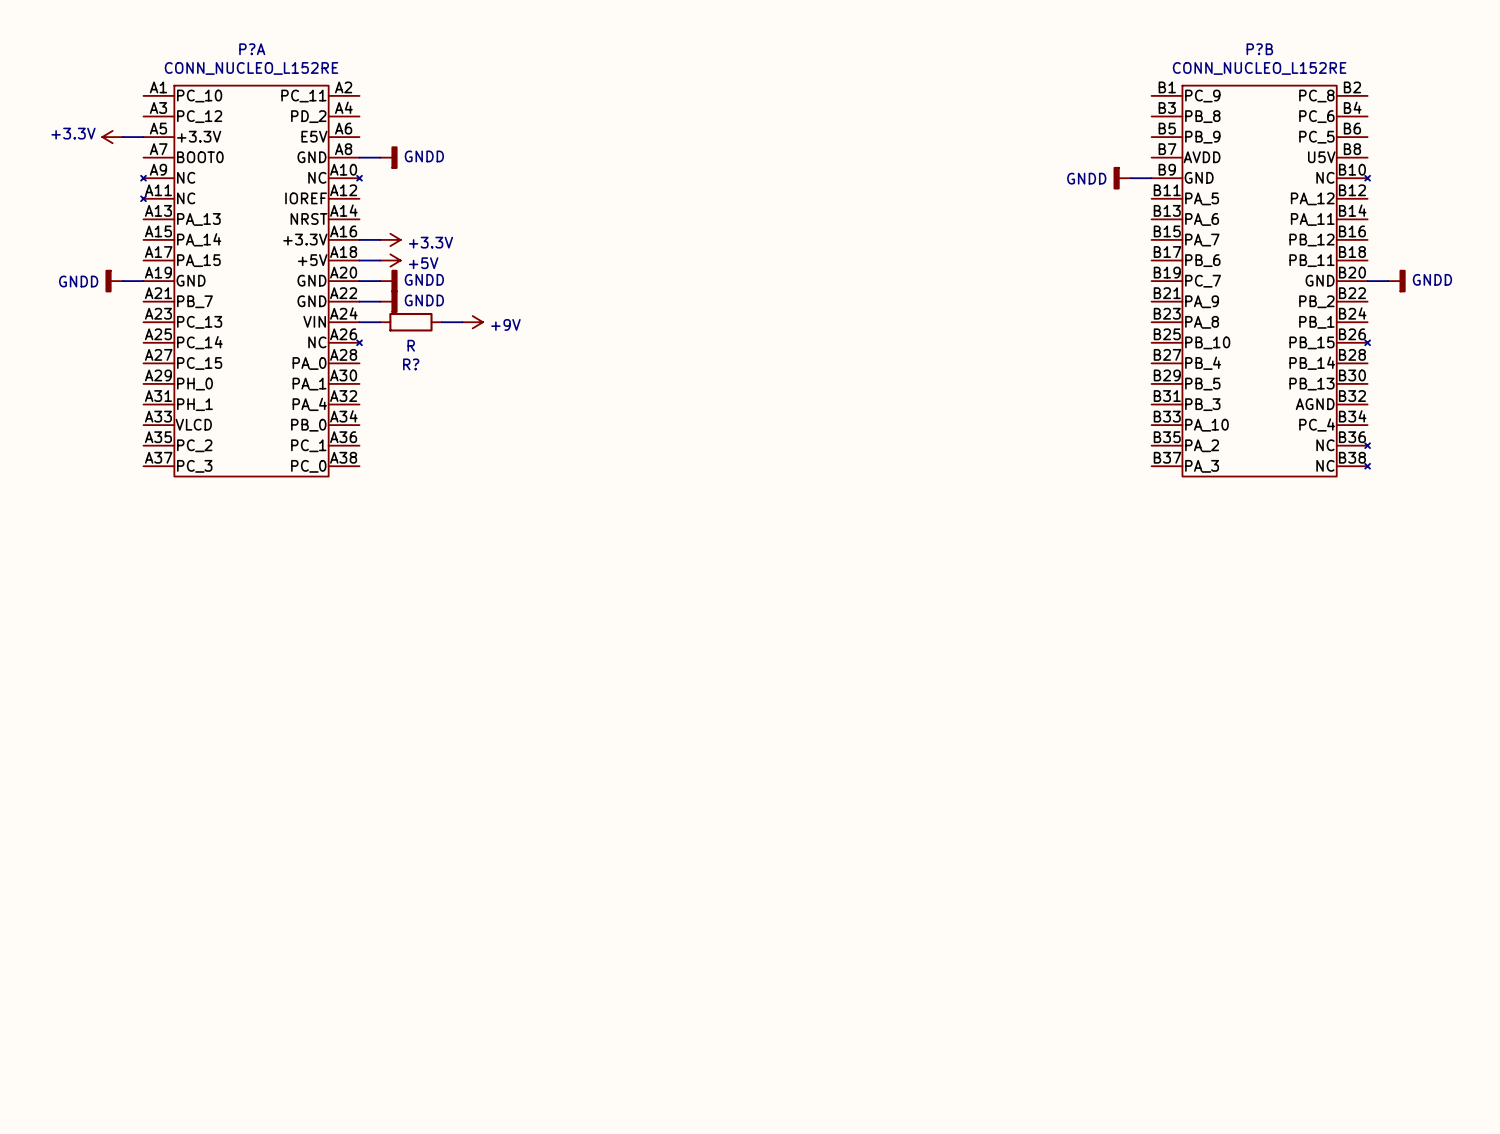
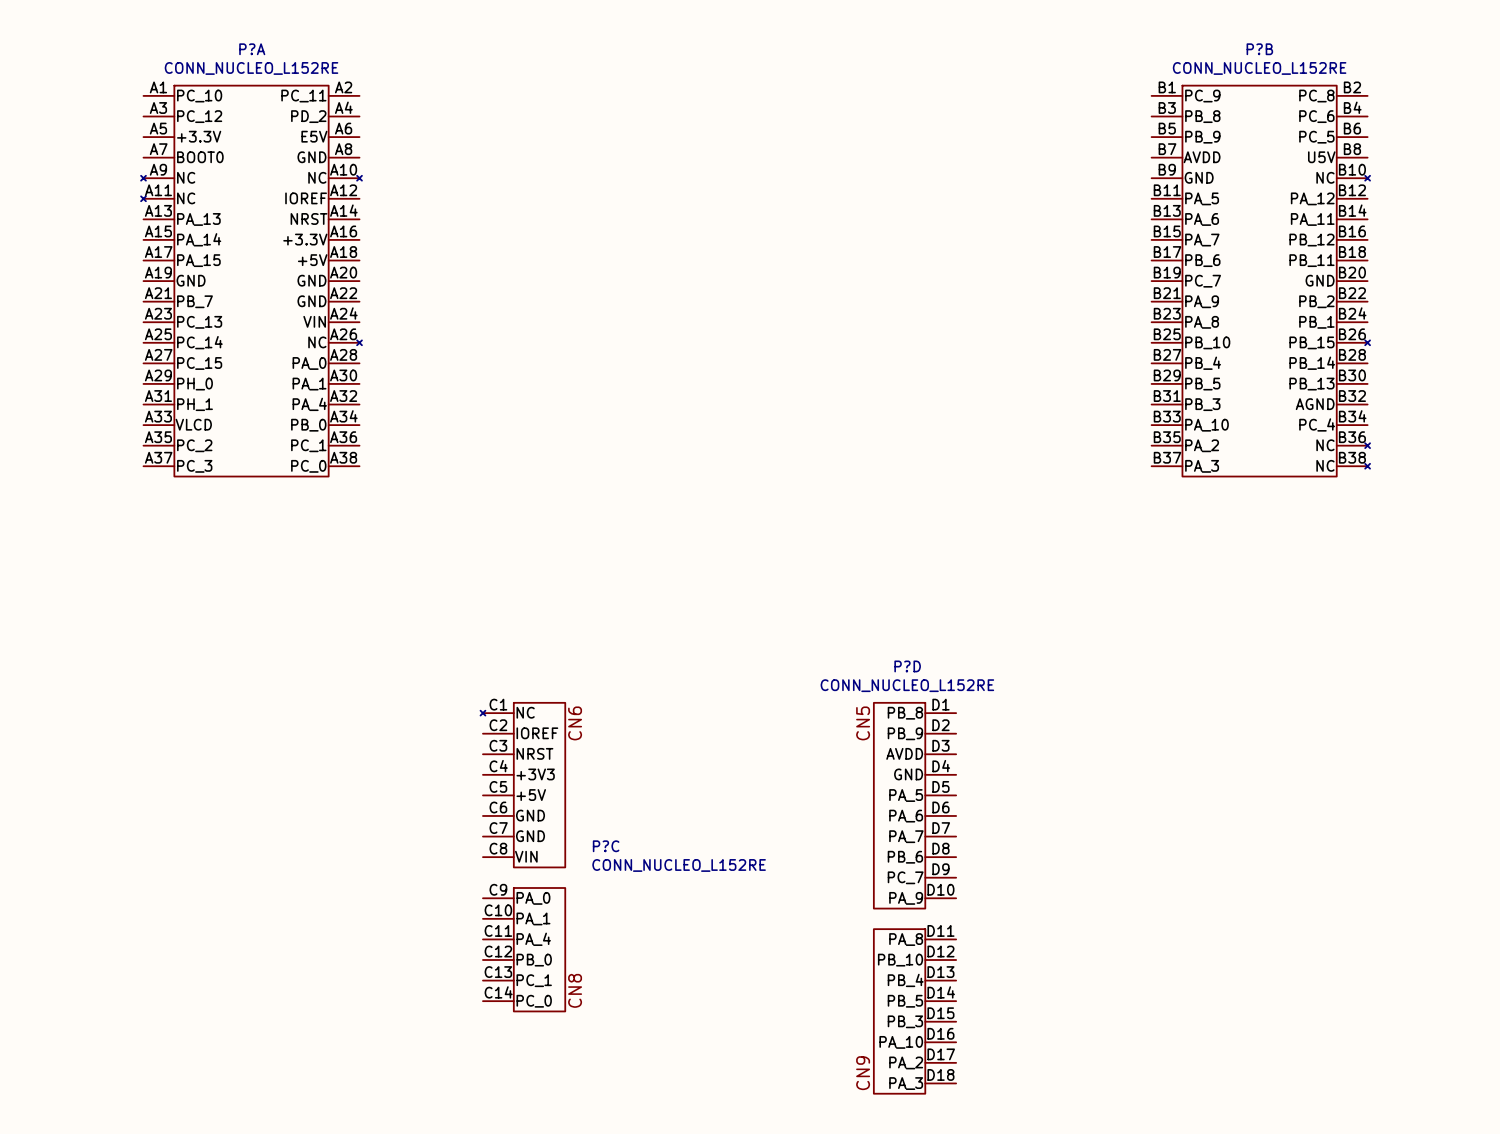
power symbol: +3.3V (112, 137) -> none
wire: (122, 137) (143, 137) -> none
wire: (359, 157) (380, 157) -> none
power symbol: GNDD (388, 157) -> none
power symbol: GNDD (1122, 178) -> none
wire: (1131, 178) (1151, 178) -> none
wire: (359, 239) (380, 239) -> none
power symbol: +3.3V (390, 239) -> none
wire: (359, 260) (380, 260) -> none
power symbol: +5V (390, 260) -> none
power symbol: GNDD (114, 281) -> none
wire: (122, 281) (143, 281) -> none
wire: (359, 281) (380, 281) -> none
power symbol: GNDD (388, 281) -> none
wire: (1367, 281) (1388, 281) -> none
power symbol: GNDD (1396, 281) -> none
wire: (359, 301) (380, 301) -> none
power symbol: GNDD (388, 301) -> none
wire: (359, 322) (380, 322) -> none
R?: R (410, 322) -> none
wire: (441, 322) (462, 322) -> none
power symbol: +9V (472, 322) -> none
P?C: none -> CONN_NUCLEO_L152RE (522, 857)
P?D: none -> CONN_NUCLEO_L152RE (915, 898)

